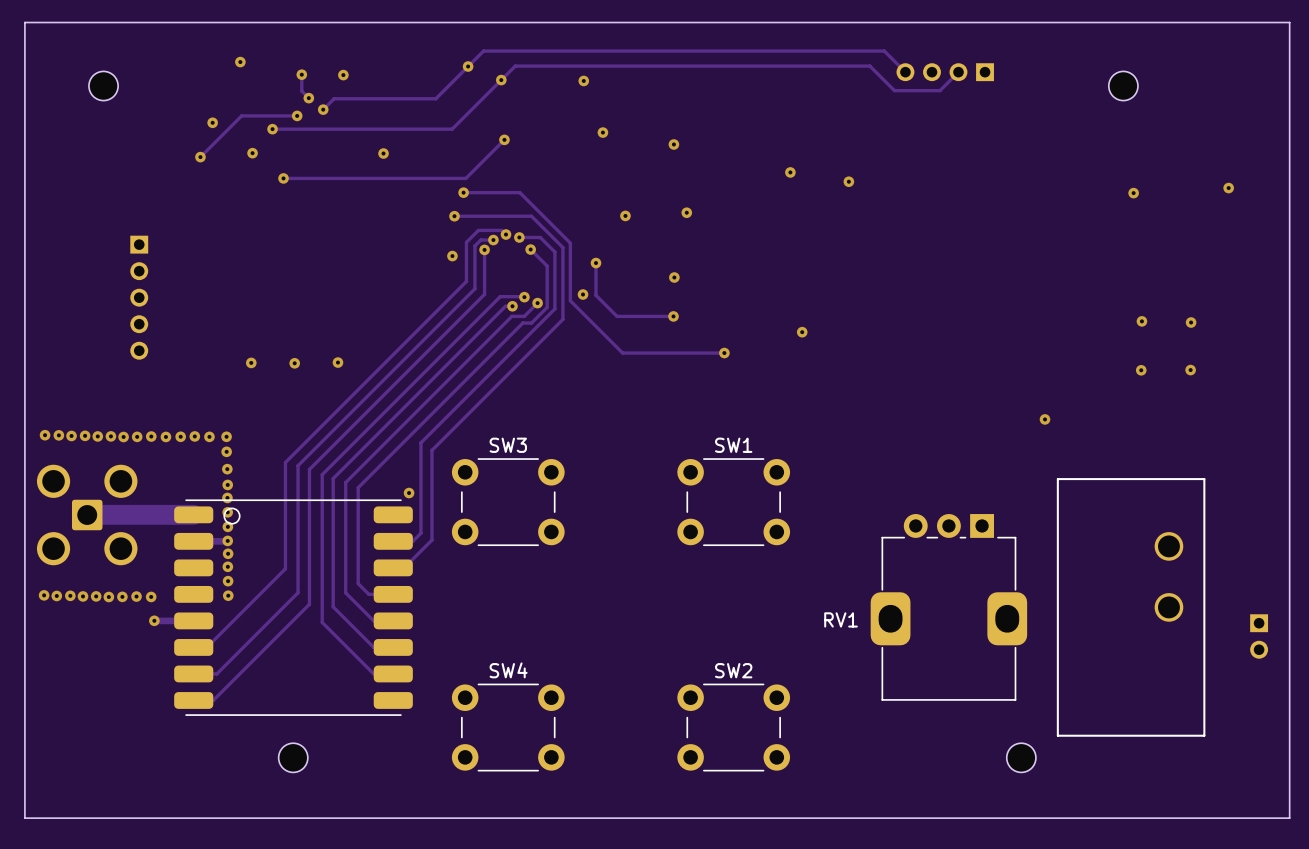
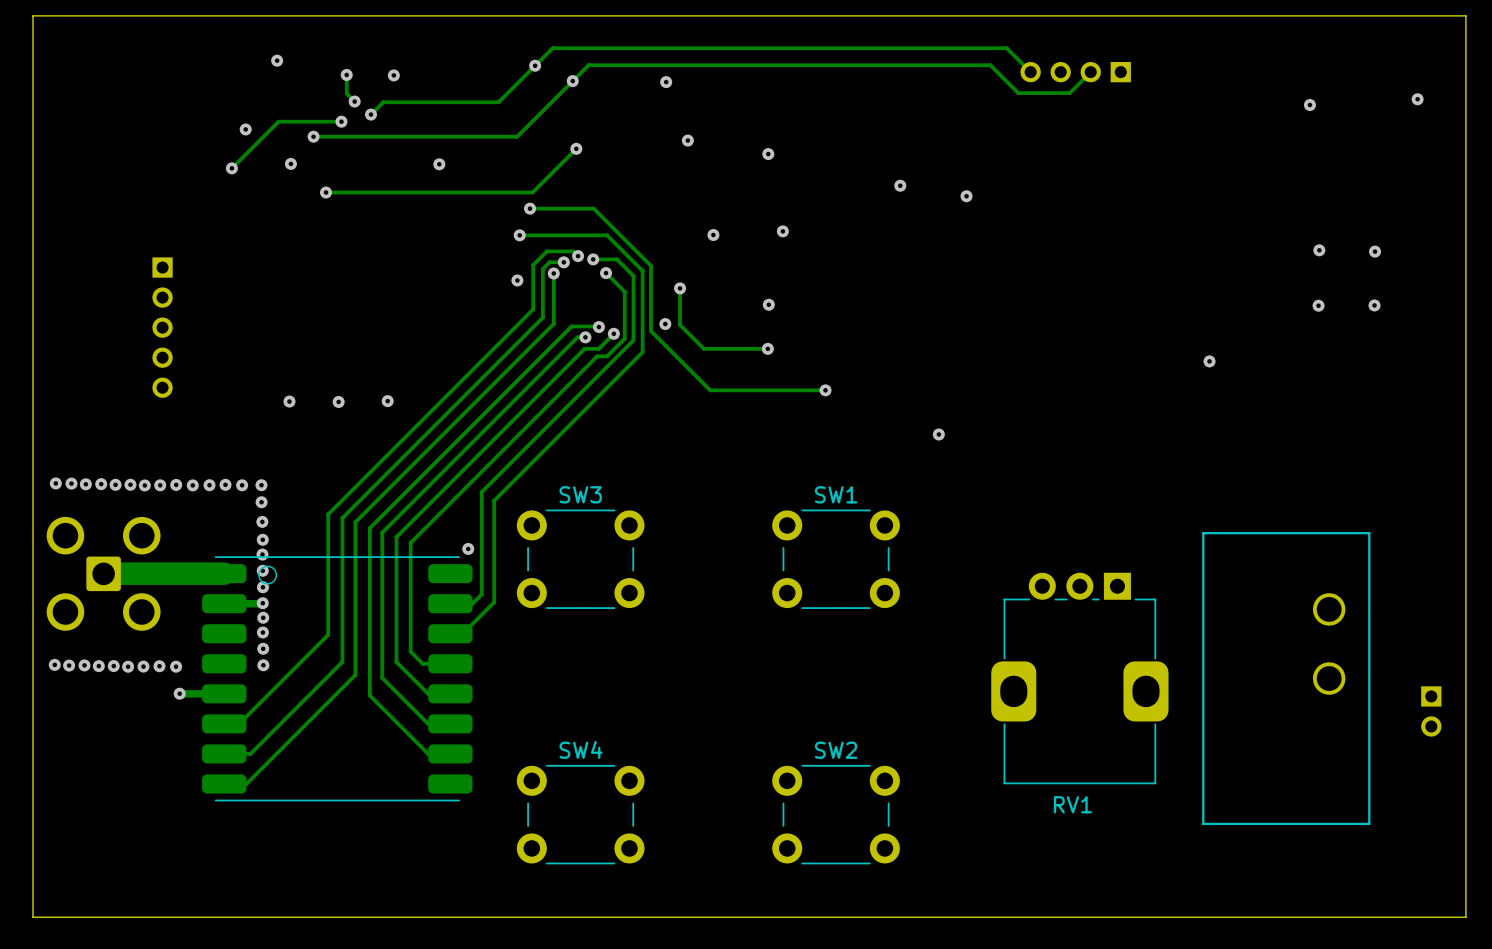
part: (103, 86) -> none
part: (1123, 86) -> none
via: none -> (1417, 99)
via: none -> (1309, 104)
via: (1228, 188) -> none
via: (1133, 193) -> none
via: none -> (1319, 250)
via: none -> (1375, 251)
via: none -> (1318, 305)
via: none -> (1374, 305)
via: (1141, 321) -> none
via: (1191, 322) -> none
via: none -> (1209, 361)
via position: (802, 332) -> (938, 434)
via: (1141, 370) -> none
via: (1190, 370) -> none
via: (1045, 419) -> none
RV1 name position: RV1 (840, 619) -> RV1 (1072, 804)
part: (293, 757) -> none
part: (1021, 757) -> none

